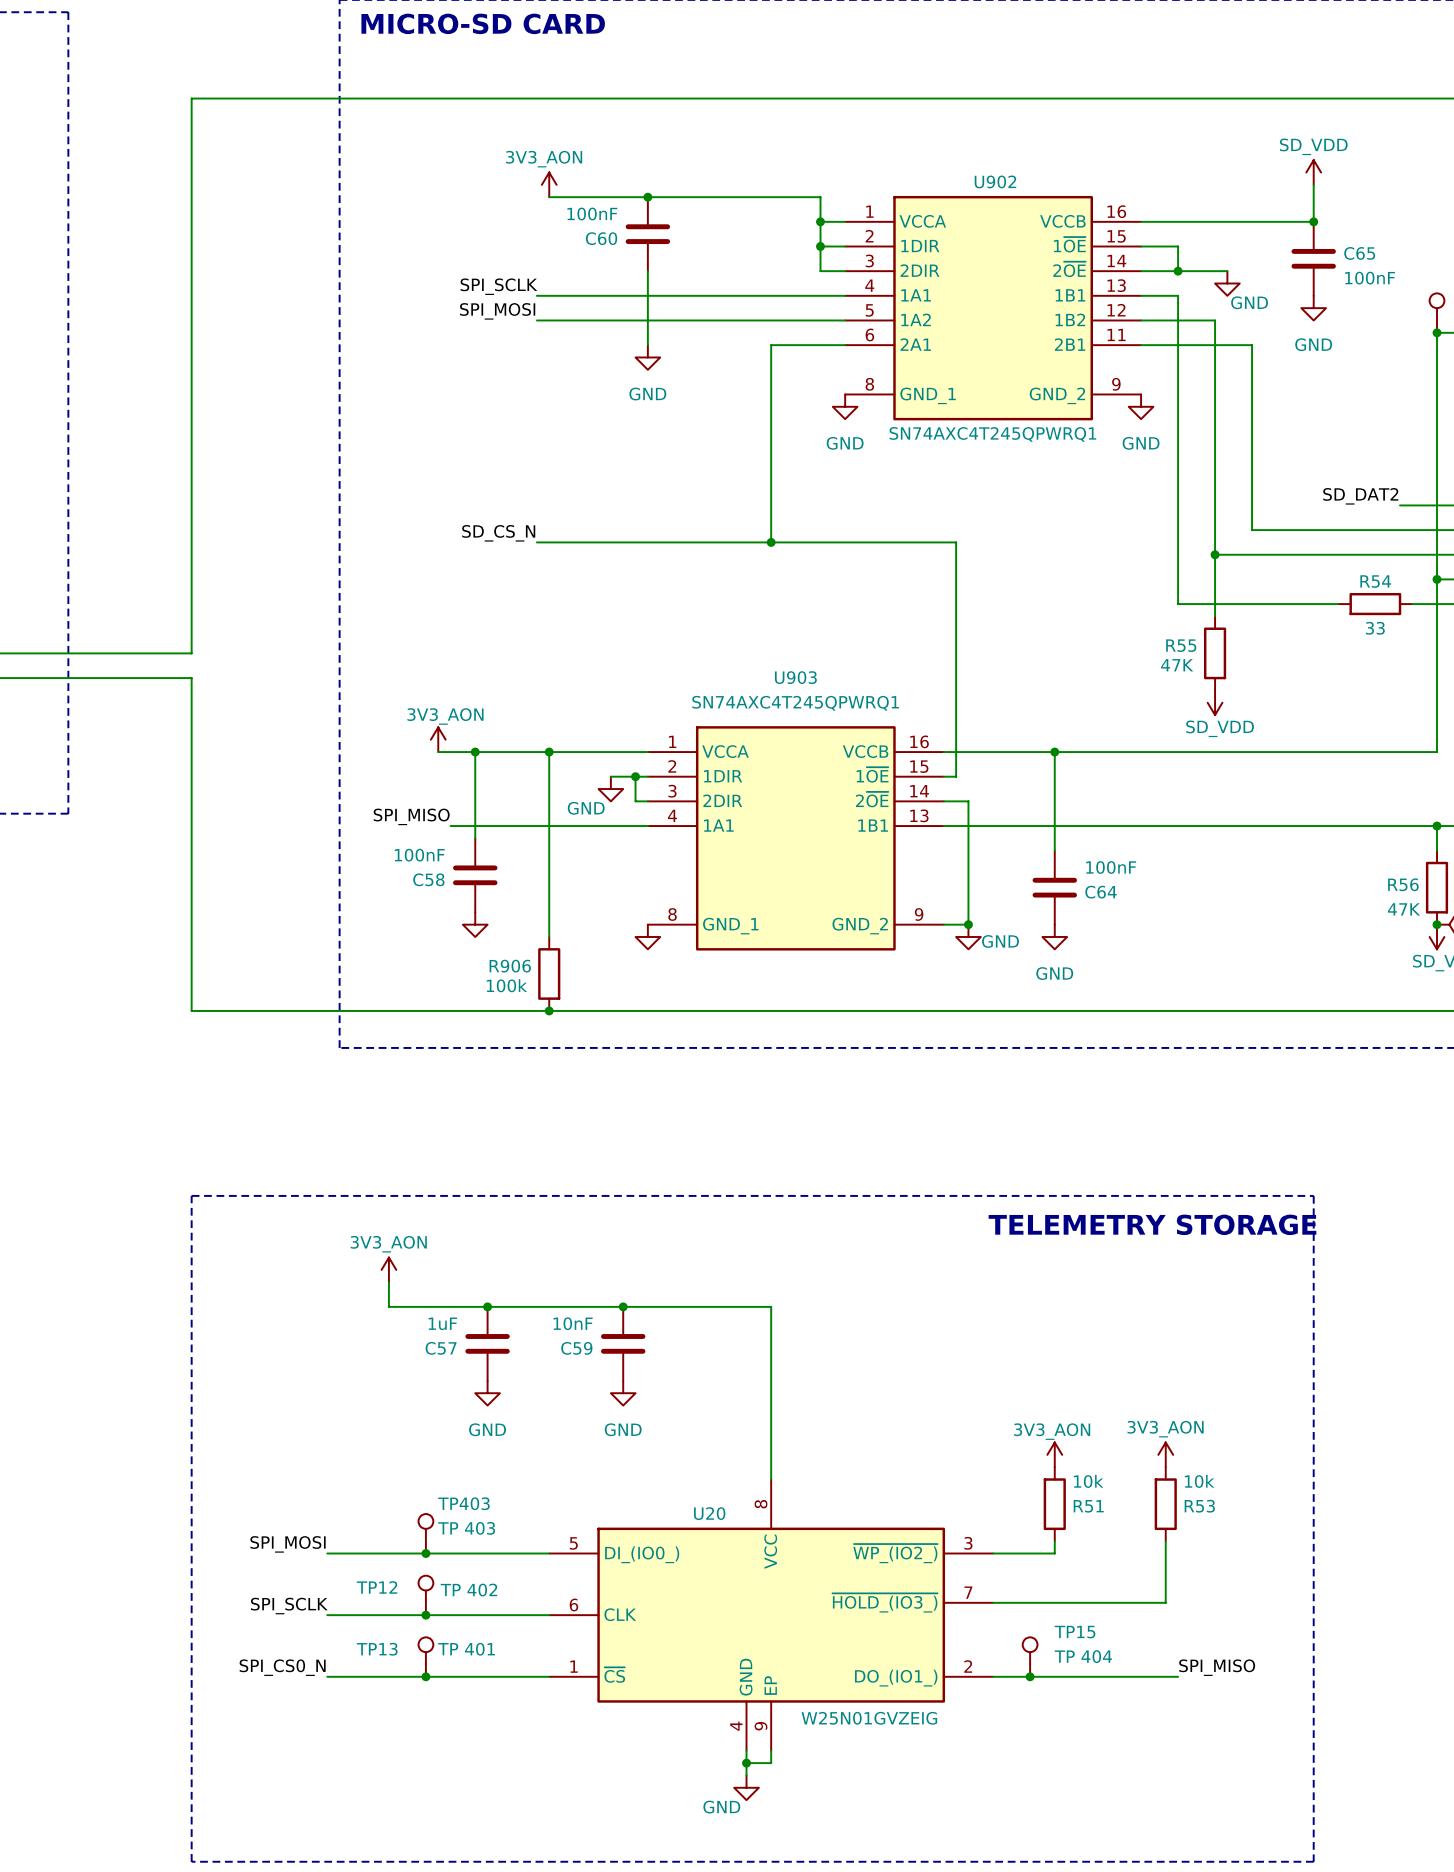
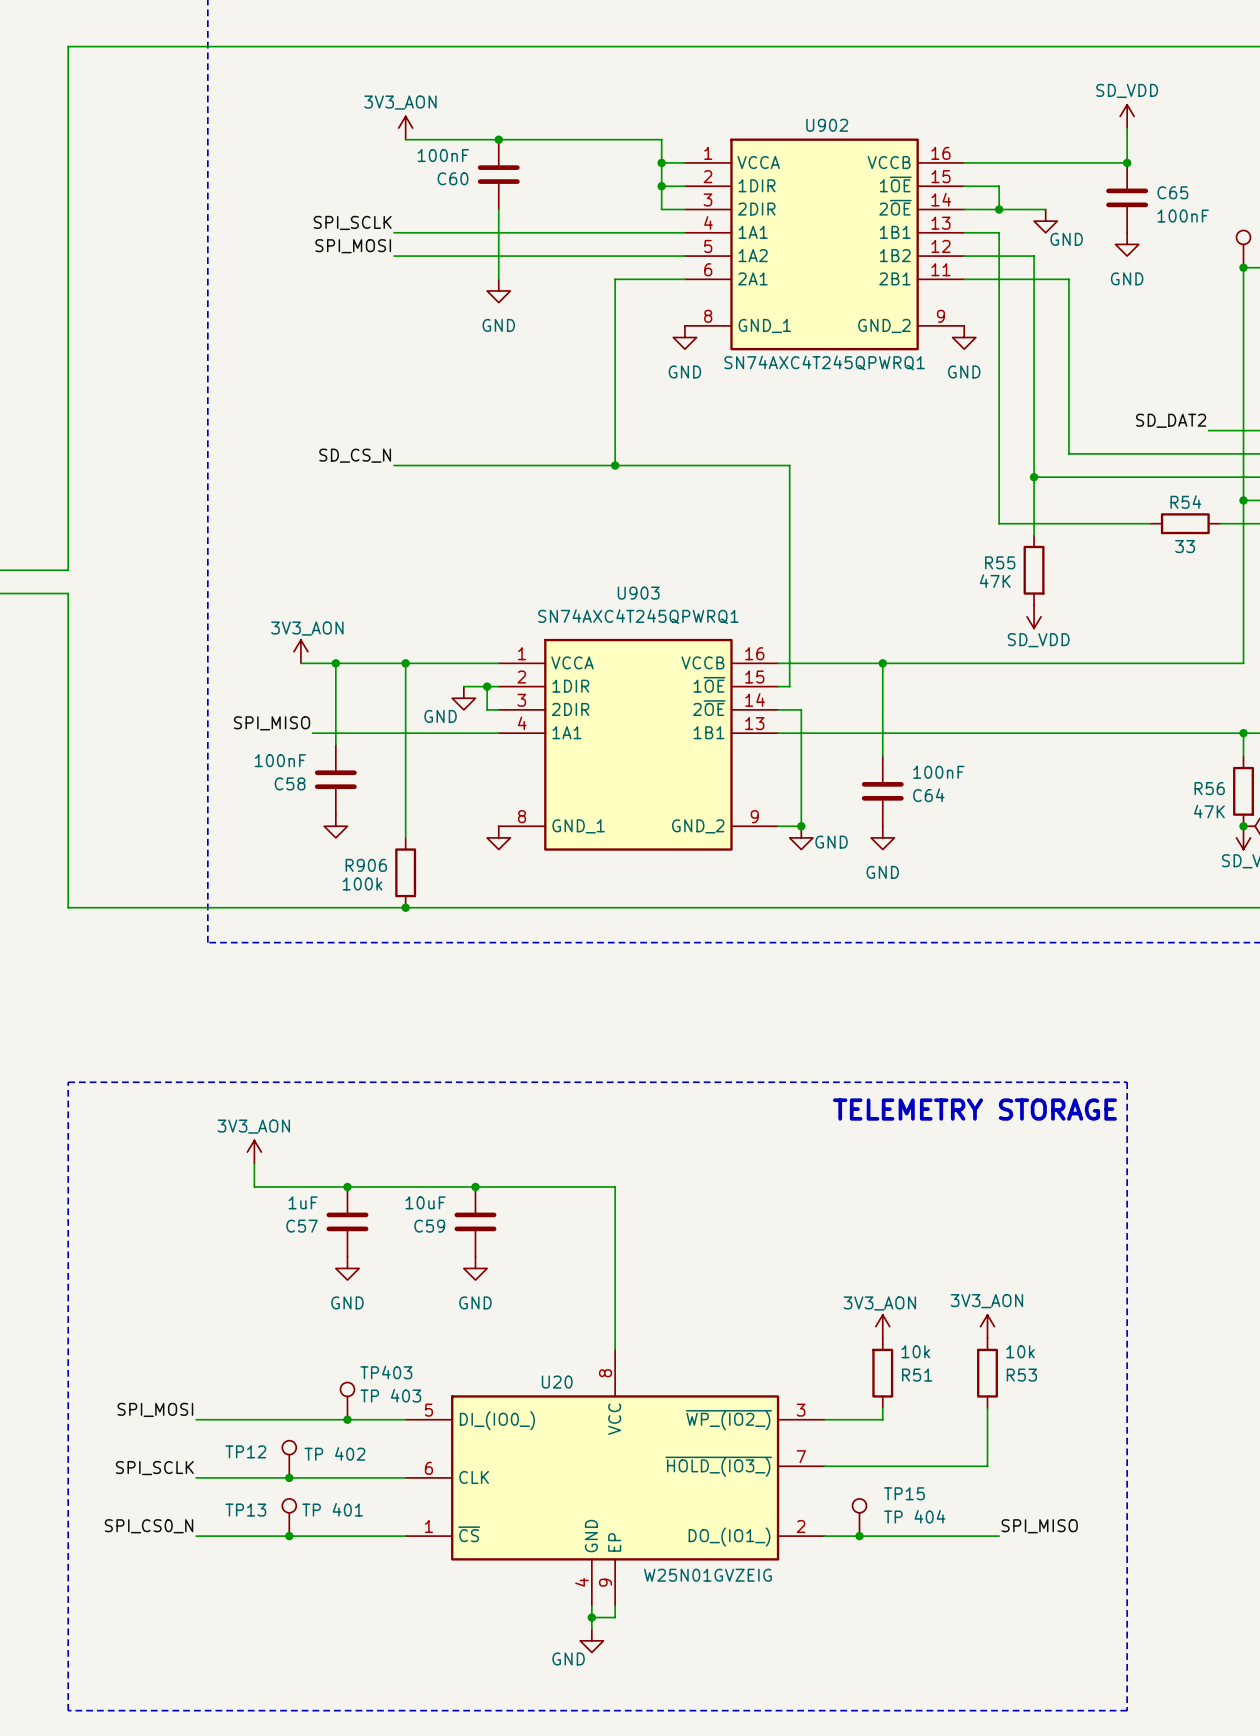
C59 value: 10nF (573, 1323) -> 10uF (425, 1202)
TP403 position: (425, 1533) -> (347, 1401)
junction: (425, 1553) -> none
junction: none -> (347, 1419)

